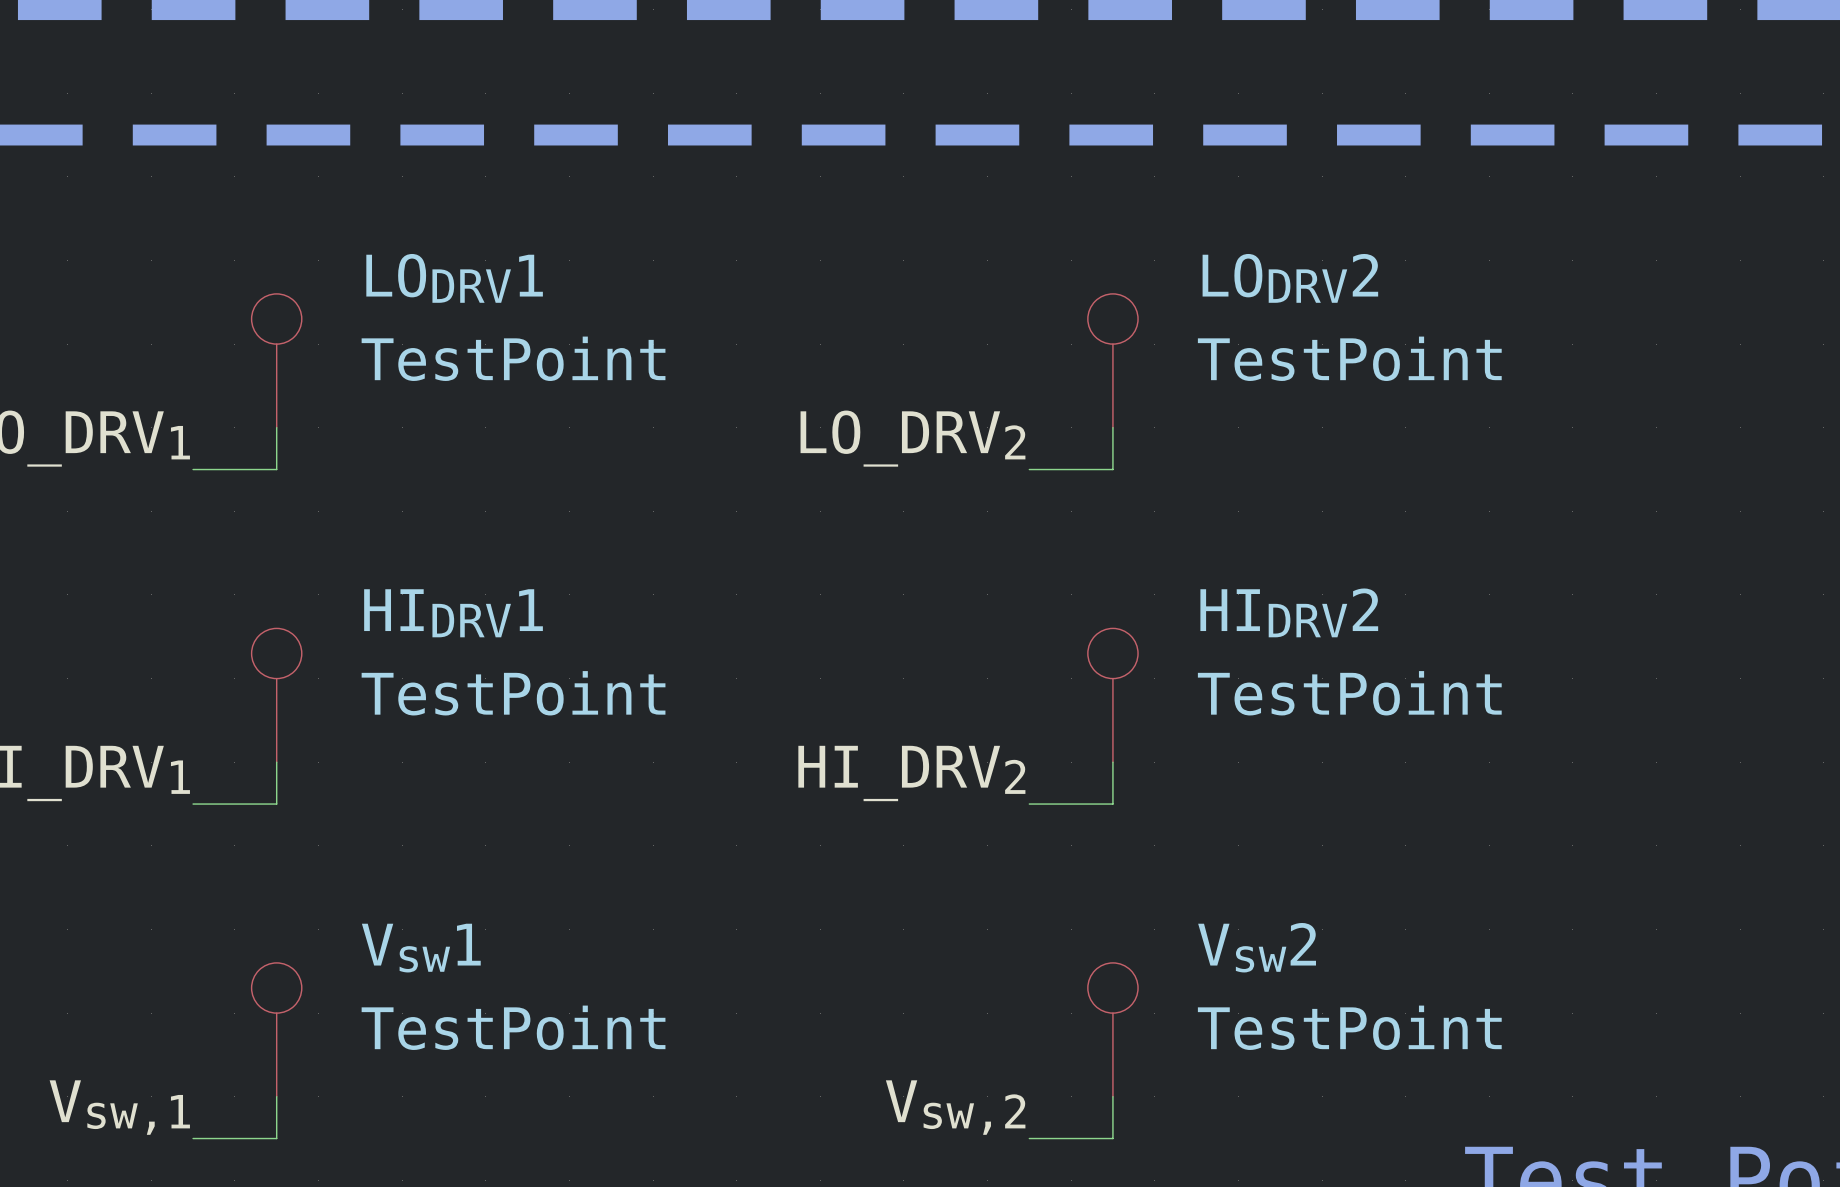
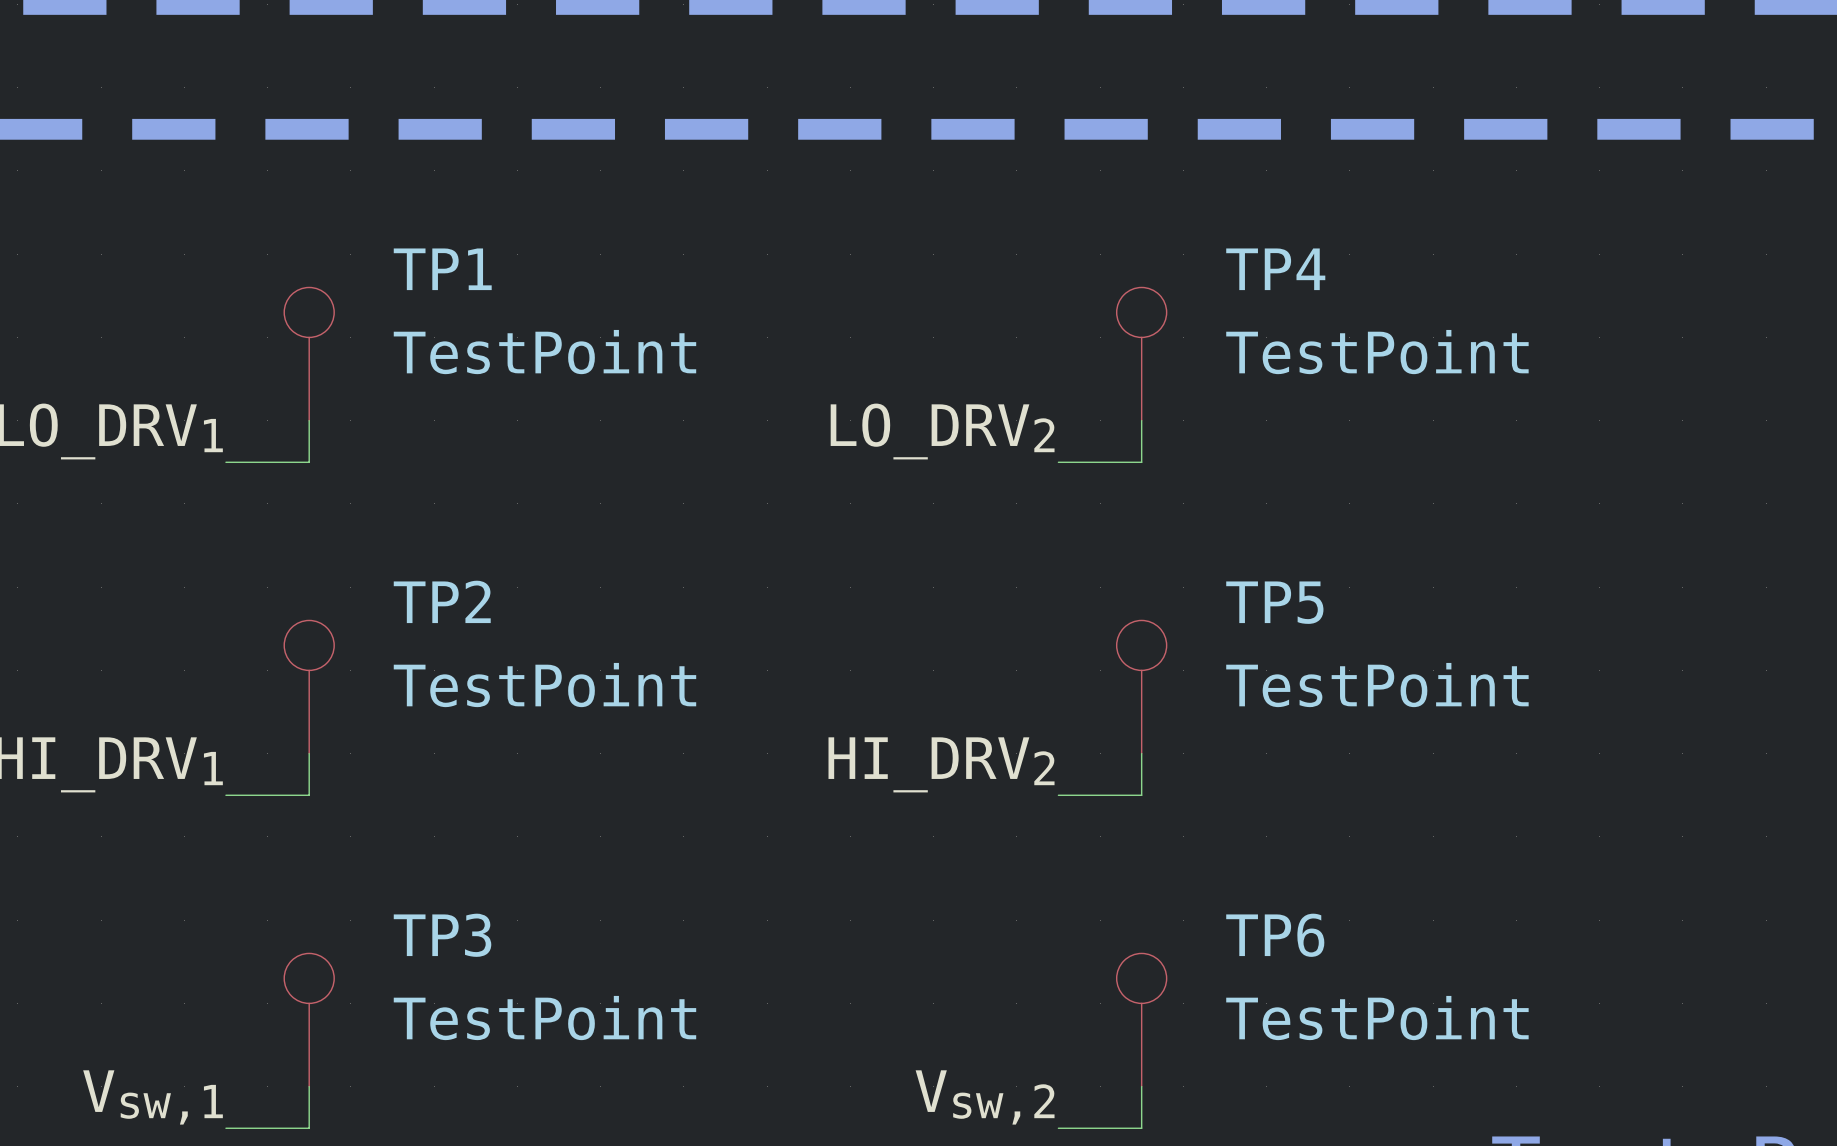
LODRV1 name: LODRV1 (454, 278) -> TP1 (442, 269)
LODRV2 name: LODRV2 (1290, 278) -> TP4 (1275, 269)
HIDRV2 name: HIDRV2 (1289, 612) -> TP5 (1274, 602)
HIDRV1 name: HIDRV1 (453, 613) -> TP2 (442, 601)
Vsw2 name: Vsw2 (1257, 947) -> TP6 (1275, 935)
Vsw1 name: Vsw1 (421, 948) -> TP3 (442, 935)

